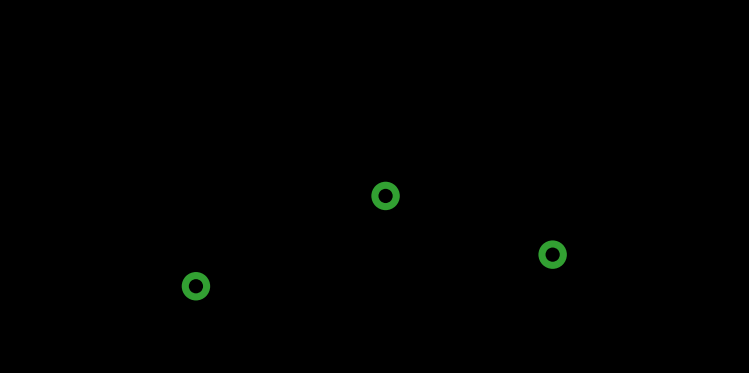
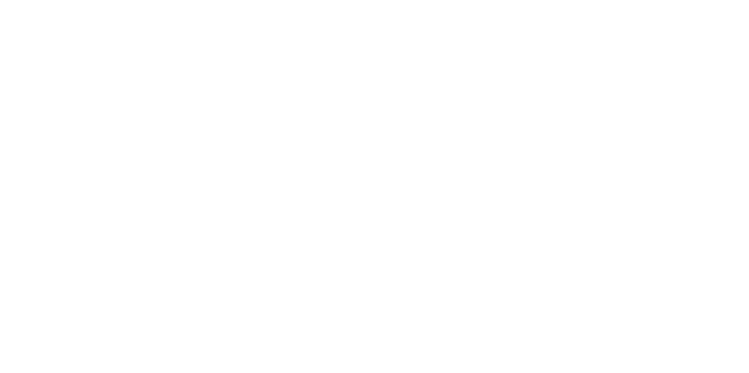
via: (385, 195) -> none
via: (552, 254) -> none
via: (195, 286) -> none

